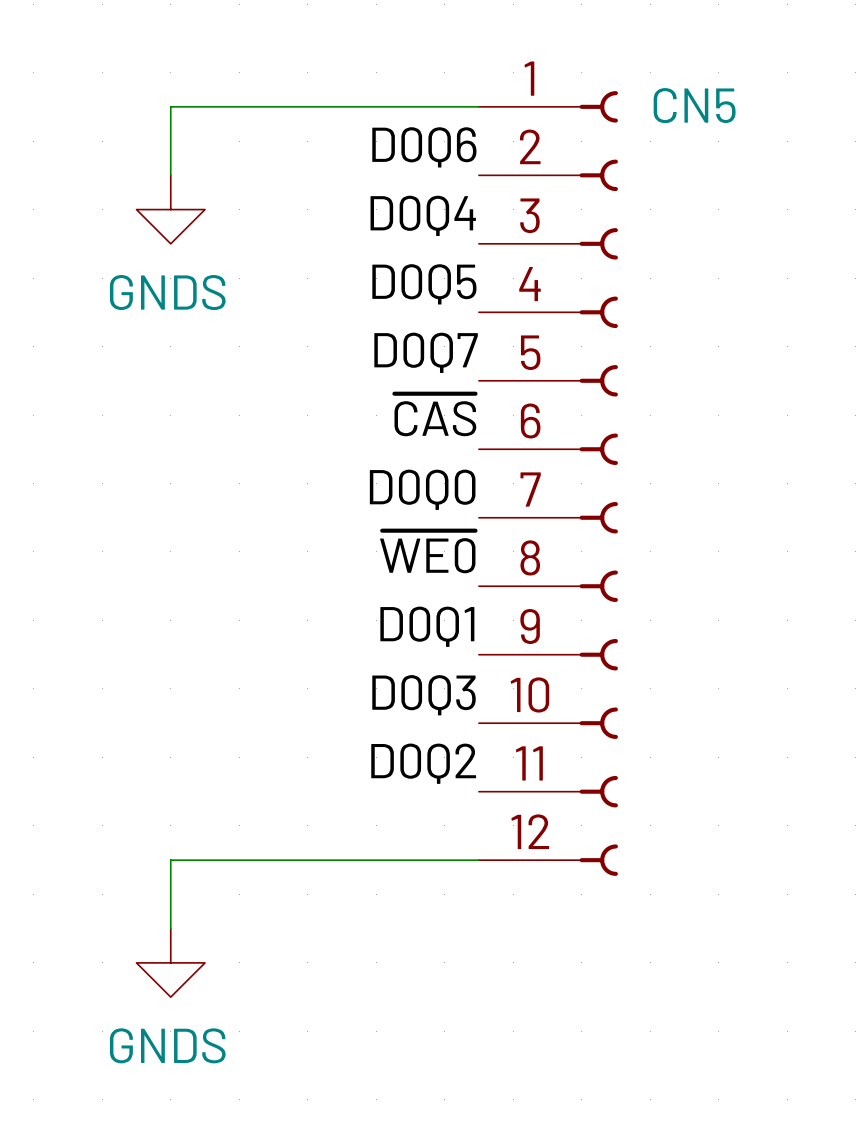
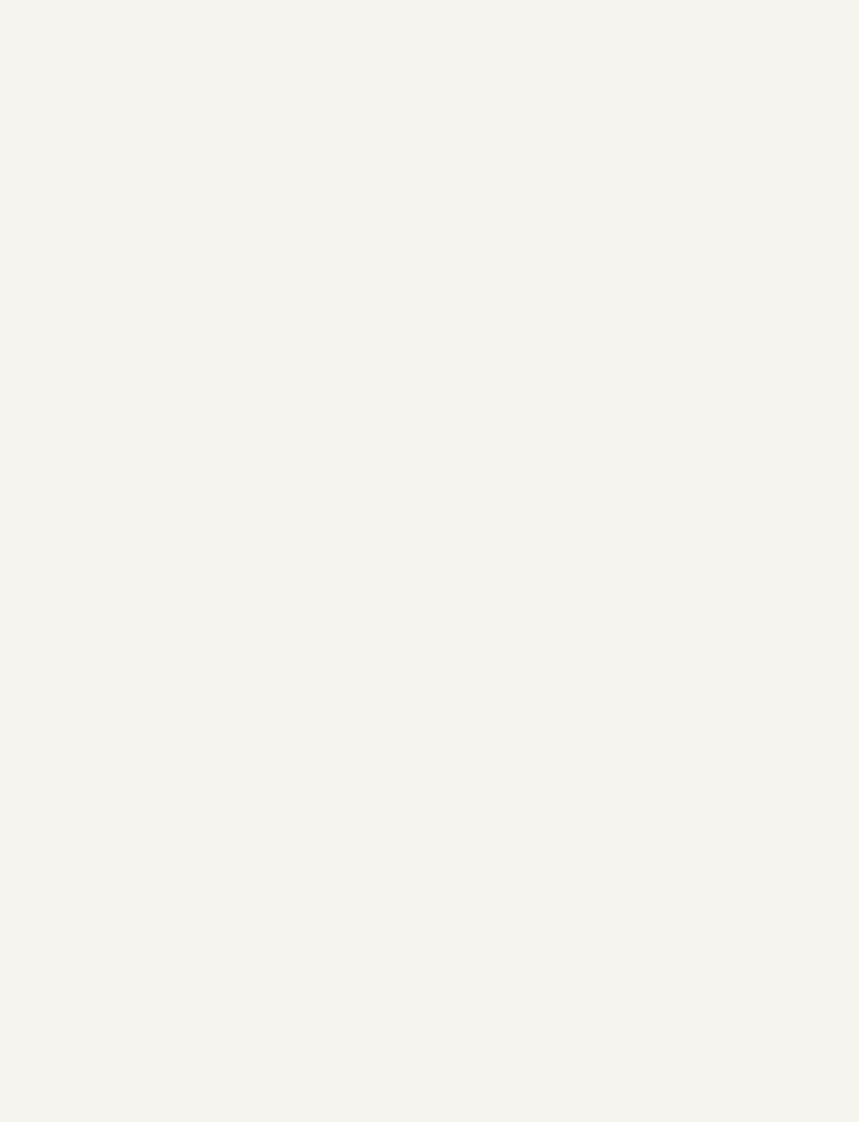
wire: (478, 106) (170, 106) (170, 175) -> none
label: D0Q6 (424, 147) -> none
power symbol: GNDS (170, 209) -> none
label: D0Q4 (423, 215) -> none
label: D0Q5 (424, 284) -> none
label: D0Q7 (426, 352) -> none
label: ~{CAS} (435, 414) -> none
CN5: (548, 483) -> none
label: D0Q0 (422, 489) -> none
label: ~{WE0} (427, 551) -> none
label: D0Q1 (427, 626) -> none
label: D0Q3 (424, 695) -> none
label: D0Q2 (423, 763) -> none
wire: (478, 860) (170, 860) (170, 928) -> none
power symbol: GNDS (170, 962) -> none

